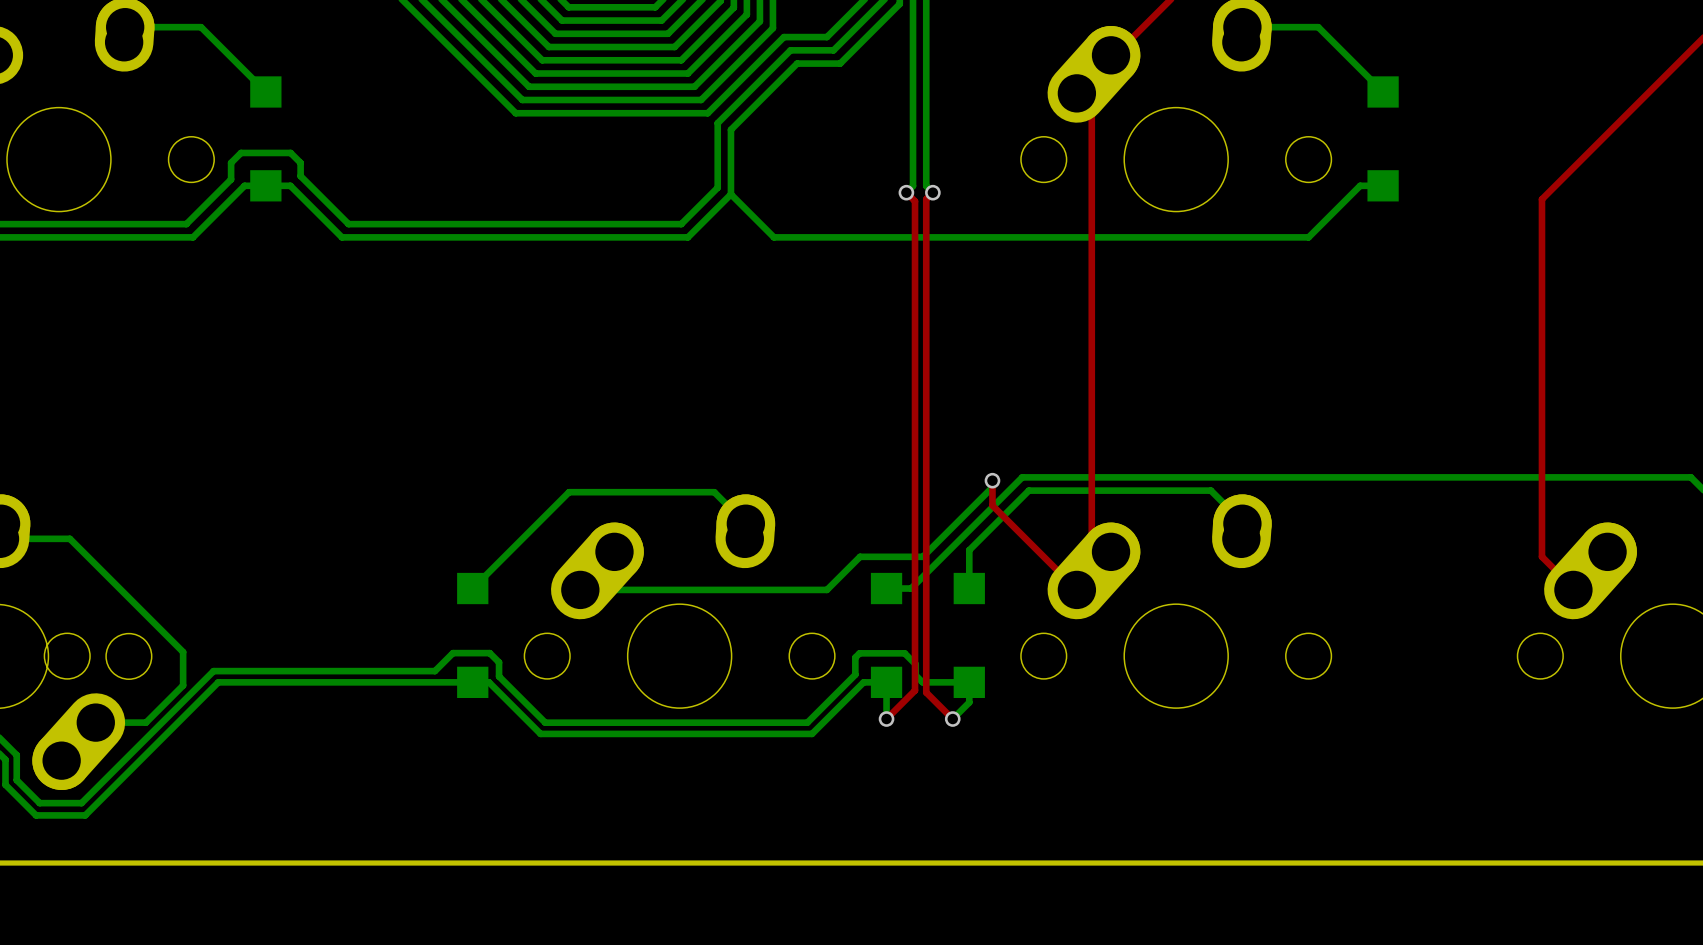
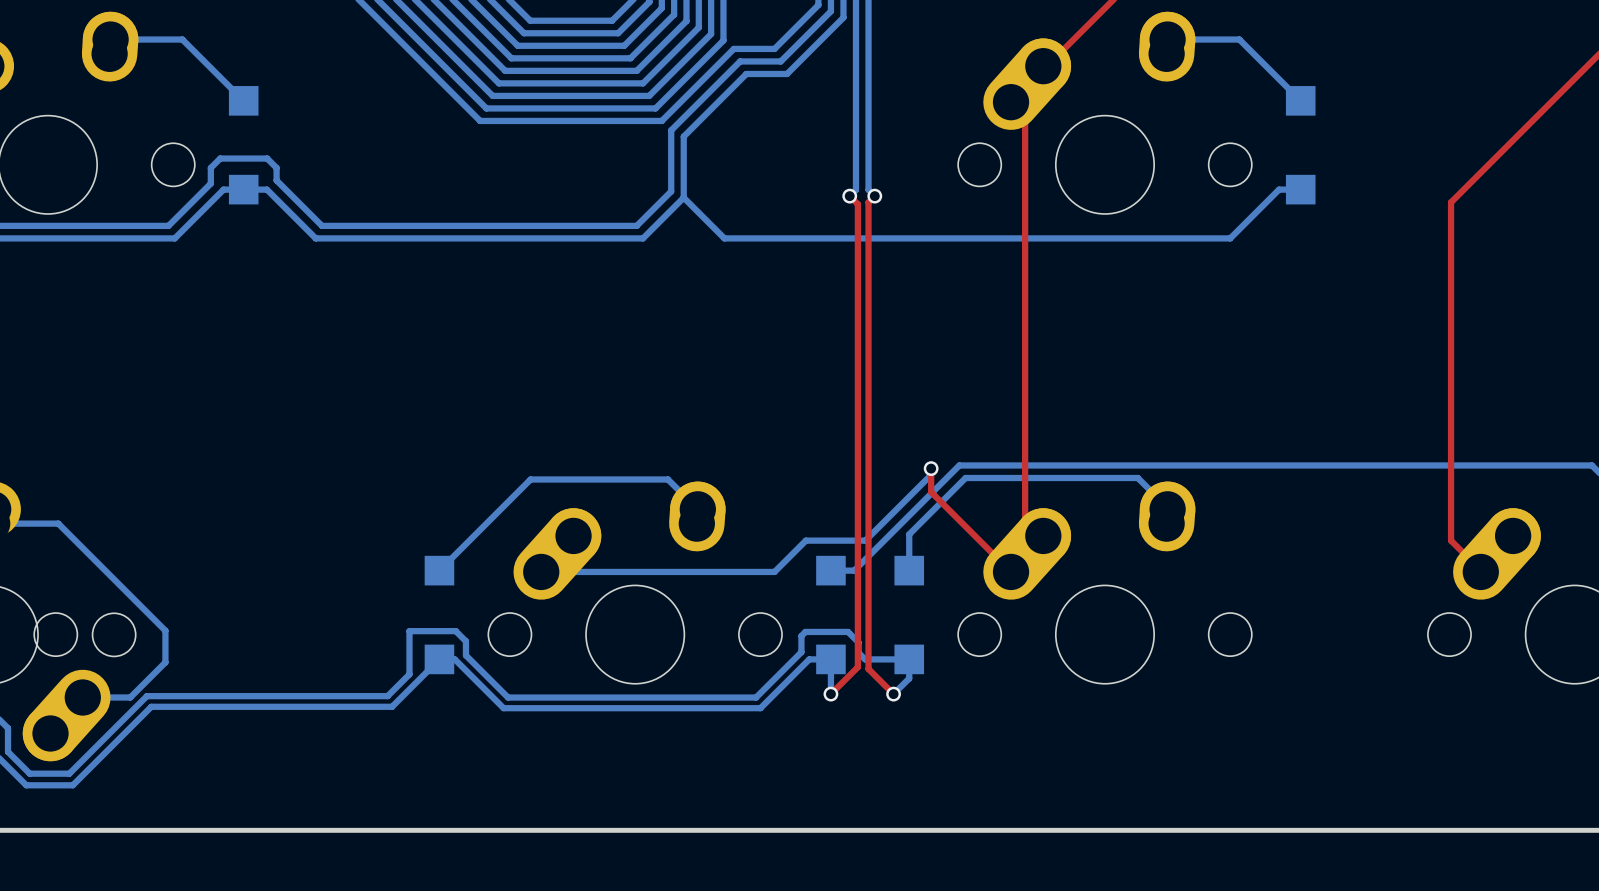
bottom track: (500, 678) (499, 676) (499, 662) (489, 653) (452, 653) (434, 671) (213, 671) (163, 721) -> (465, 655) (465, 641) (455, 631) (409, 631) (409, 674) (387, 696) (146, 696)
bottom track: (472, 682) (218, 682) (168, 732) -> (439, 659) (392, 706) (151, 706)

